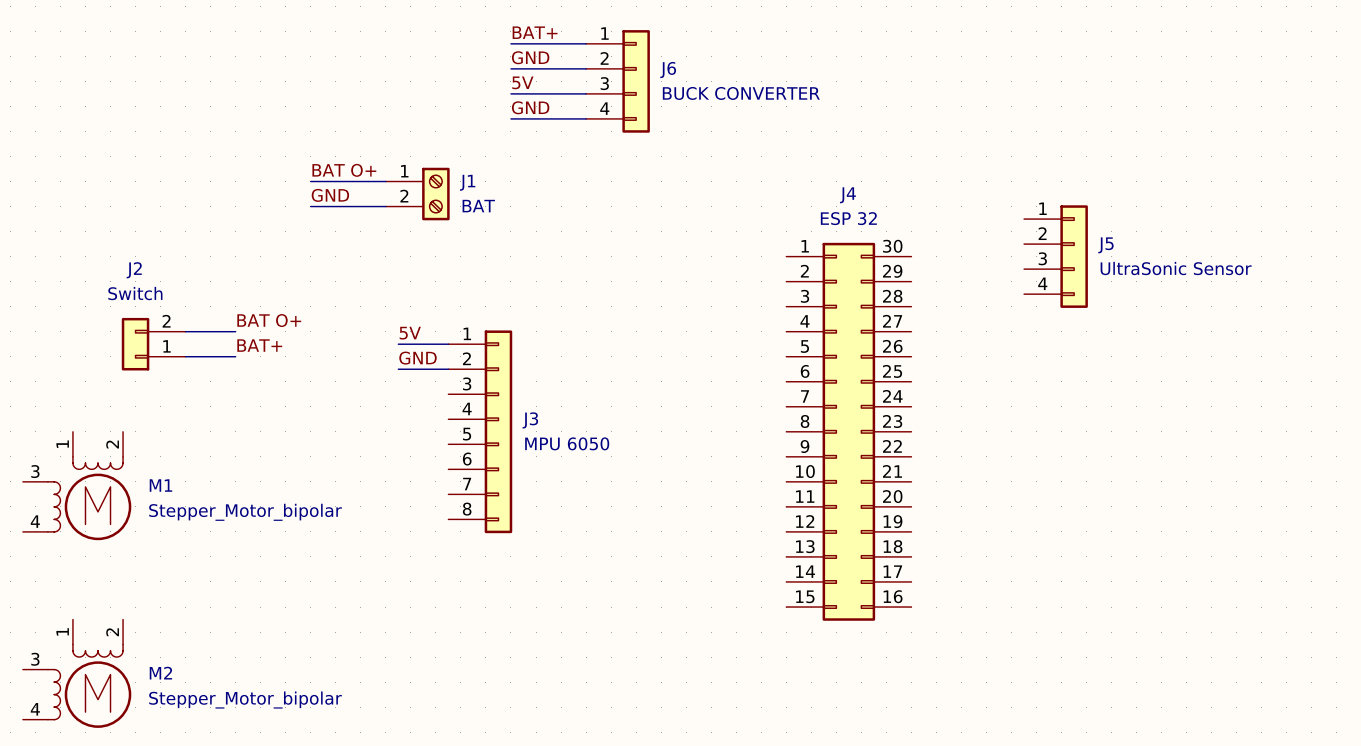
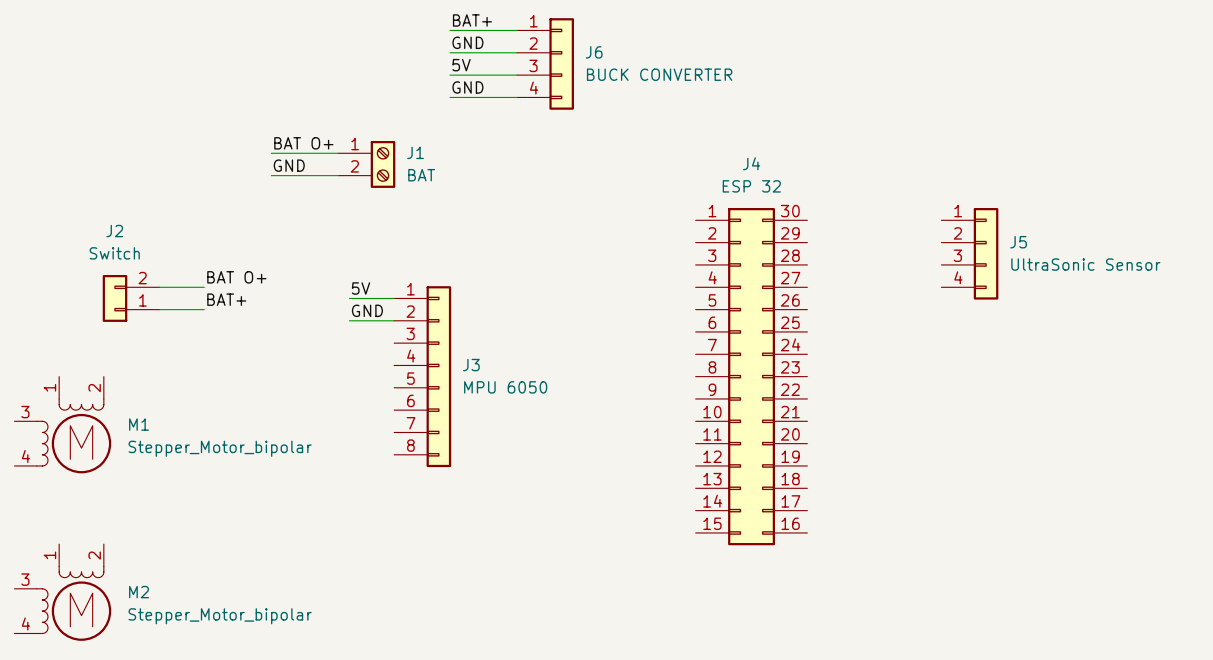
J5 position: (1055, 256) -> (969, 253)

